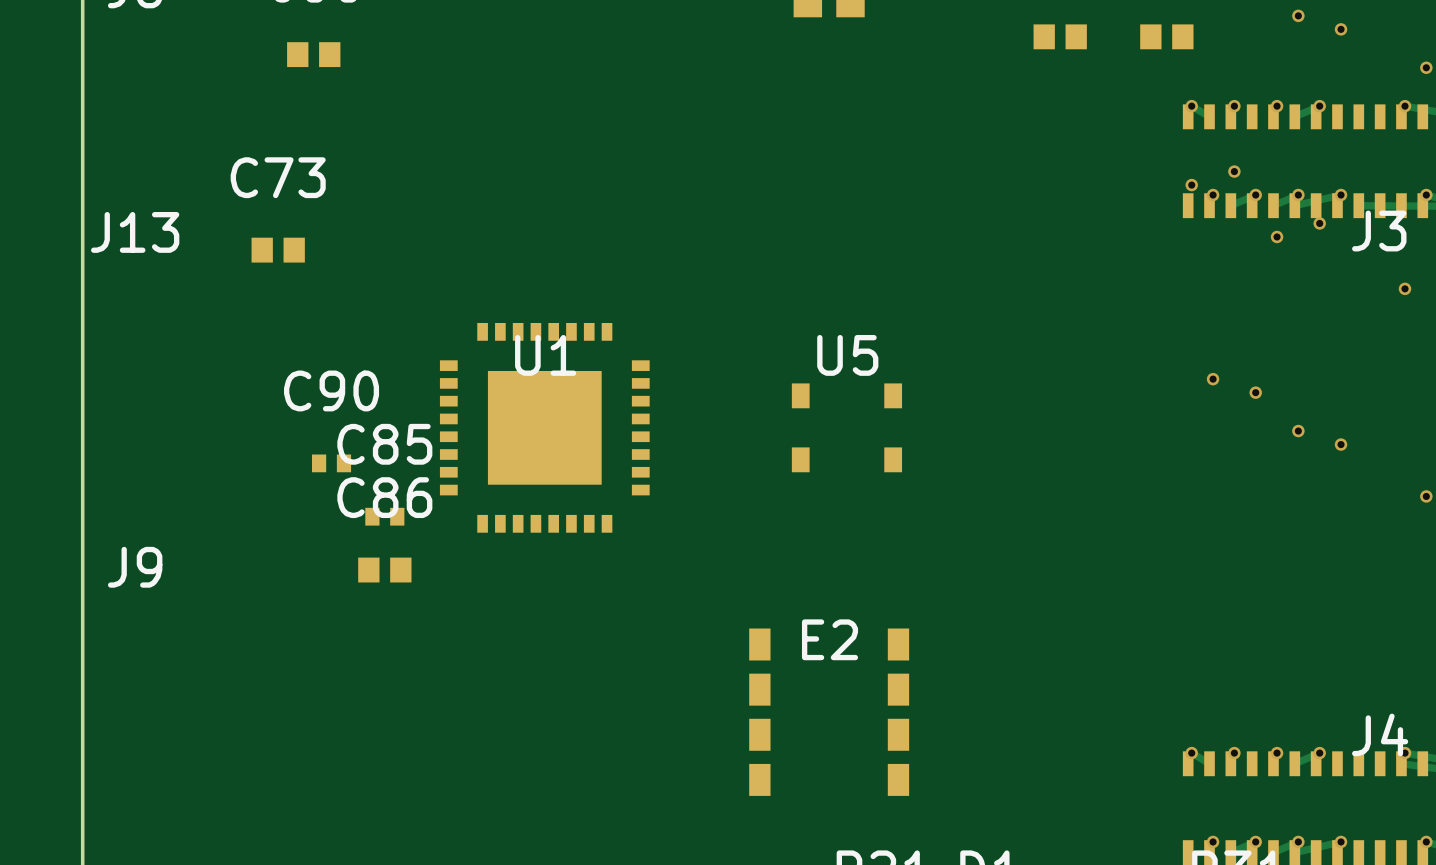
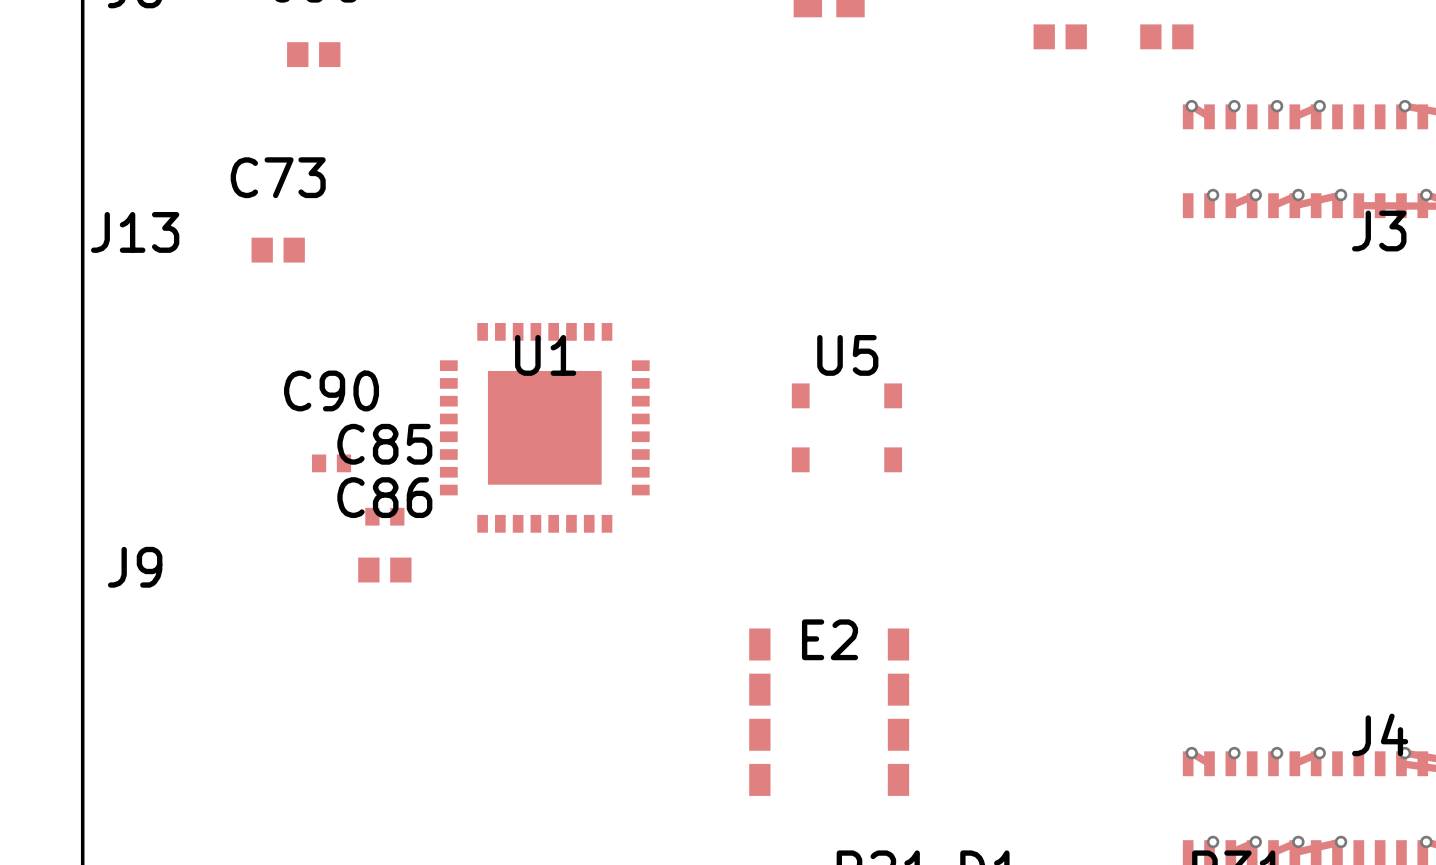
via: (1298, 15) -> none
via: (1341, 29) -> none
via: (1426, 67) -> none
via: (1234, 171) -> none
via: (1191, 185) -> none
via: (1319, 223) -> none
via: (1277, 236) -> none
via: (1405, 288) -> none
via: (1213, 379) -> none
via: (1255, 392) -> none
via: (1298, 431) -> none
via: (1341, 444) -> none
via: (1426, 496) -> none

